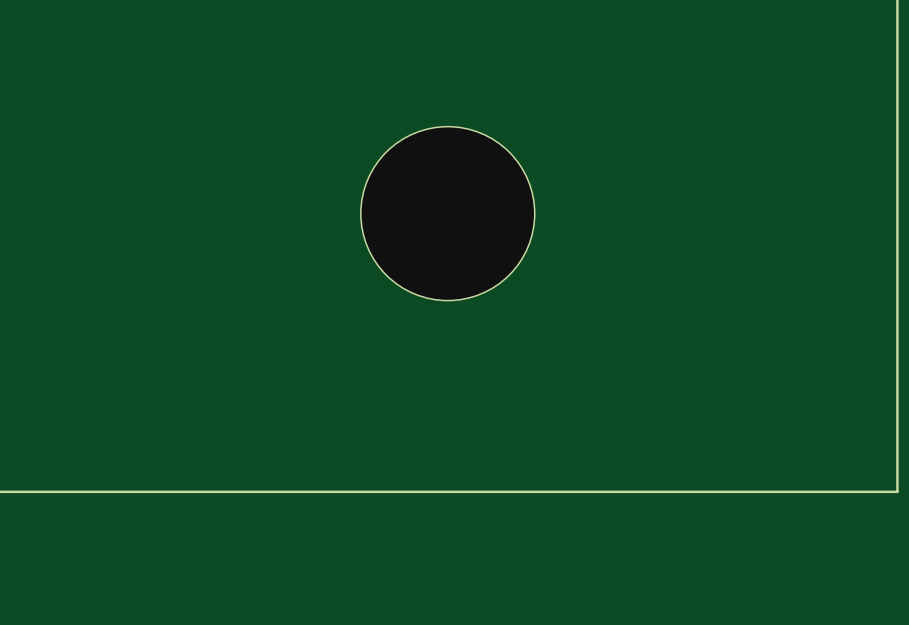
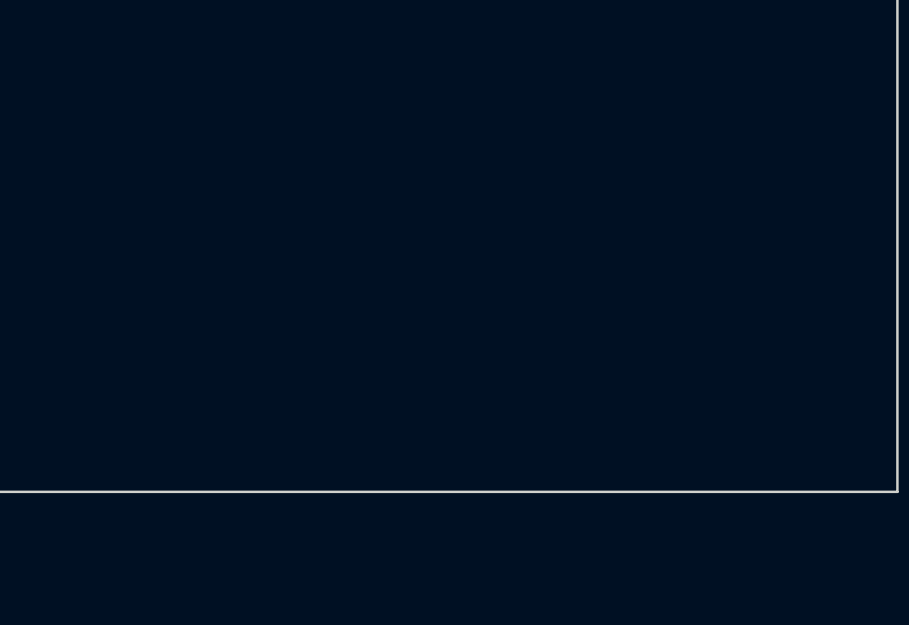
part: (447, 213) -> none

